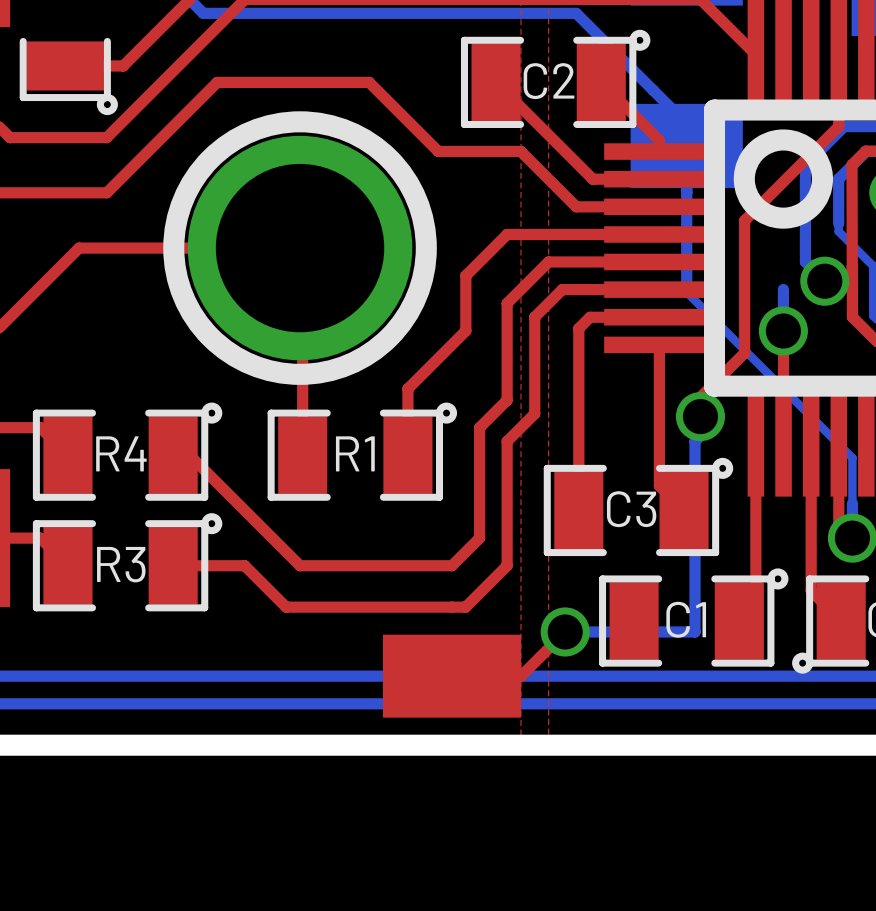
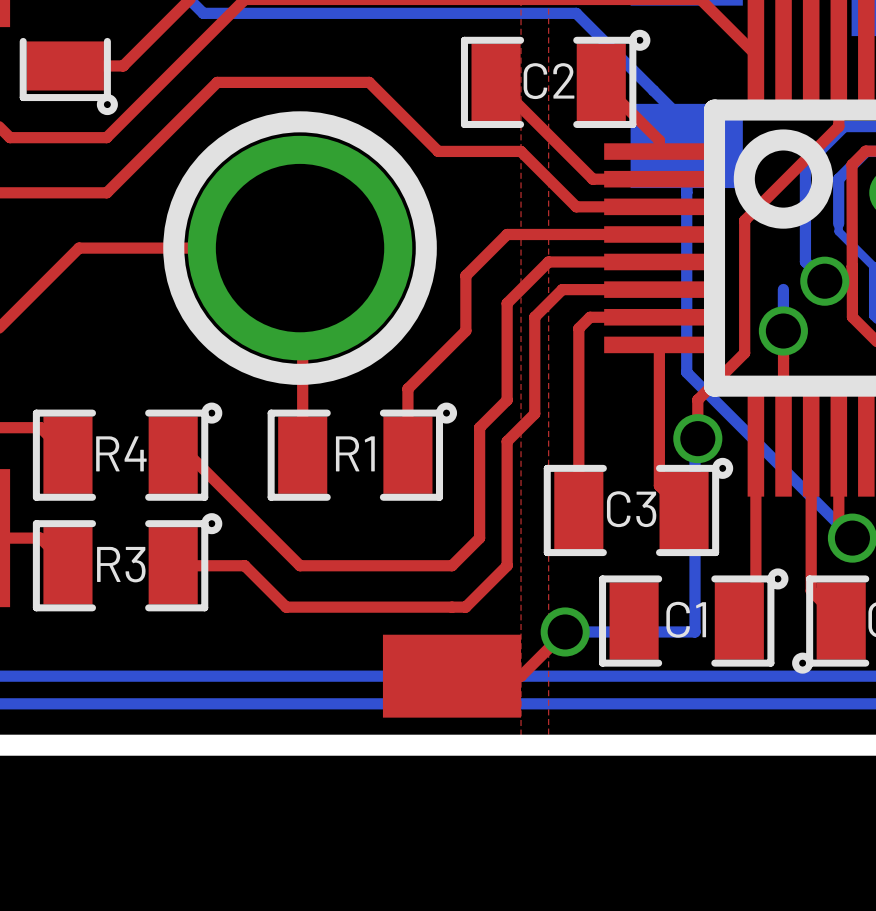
bottom track: (686, 292) (852, 457) (852, 538) -> (686, 292) (686, 372) (852, 538)
via position: (700, 416) -> (697, 438)

